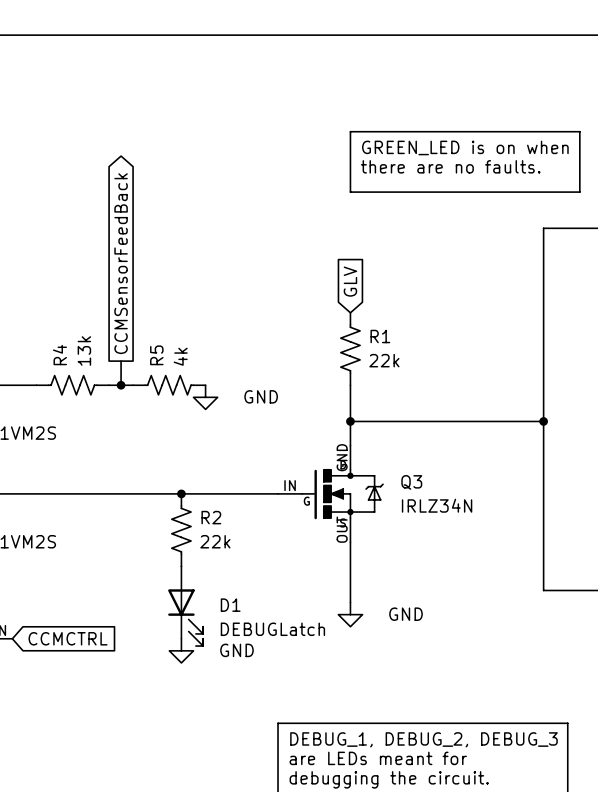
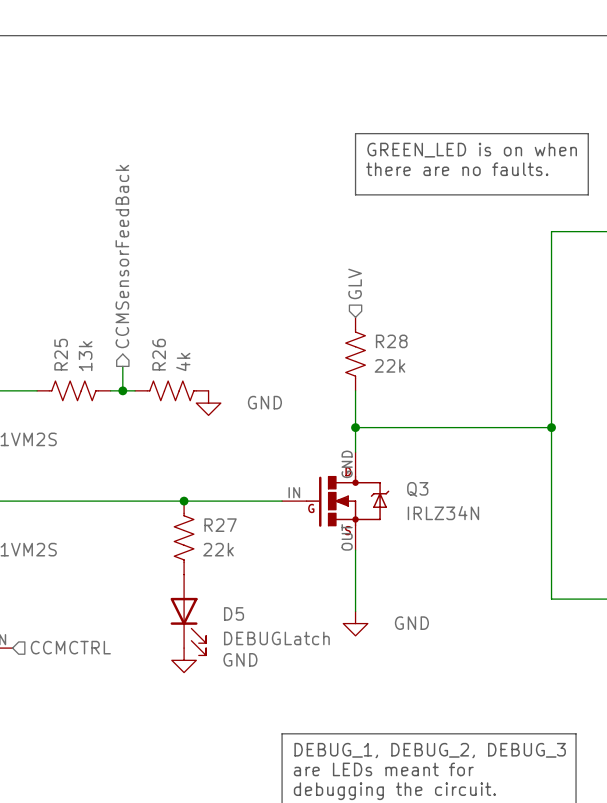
hierarchical label: none -> CCMSensorFeedBack (122, 256)
global label: CCMSensorFeedBack (121, 263) -> none
hierarchical label: none -> GLV (355, 283)
global label: GLV (350, 281) -> none
R1 name: R1 (380, 336) -> R28 (391, 341)
R4 name: R4 (59, 355) -> R25 (61, 354)
R5 name: R5 (156, 355) -> R26 (159, 354)
R2 name: R2 (211, 517) -> R27 (220, 525)
D1 name: D1 (230, 605) -> D5 (234, 613)
global label: CCMCTRL (68, 638) -> none
hierarchical label: none -> CCMCTRL (70, 647)

